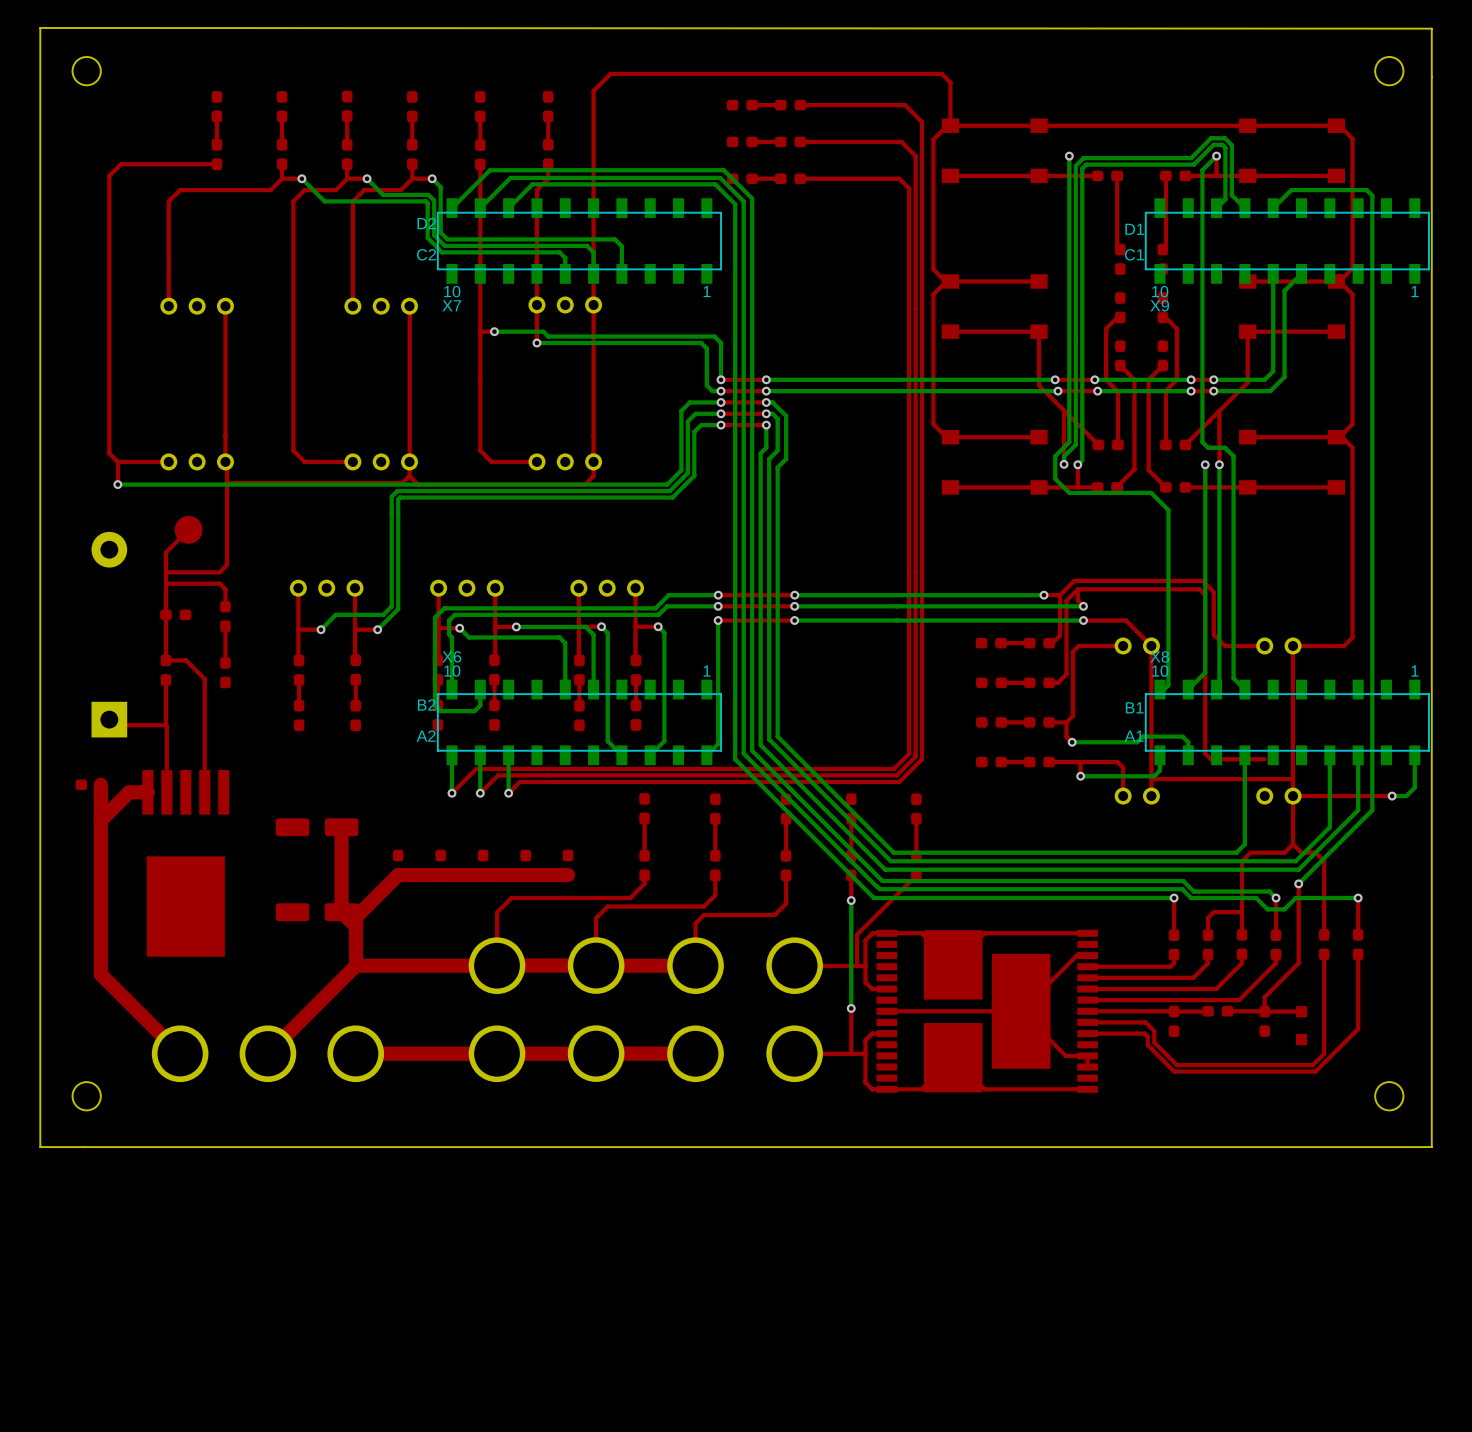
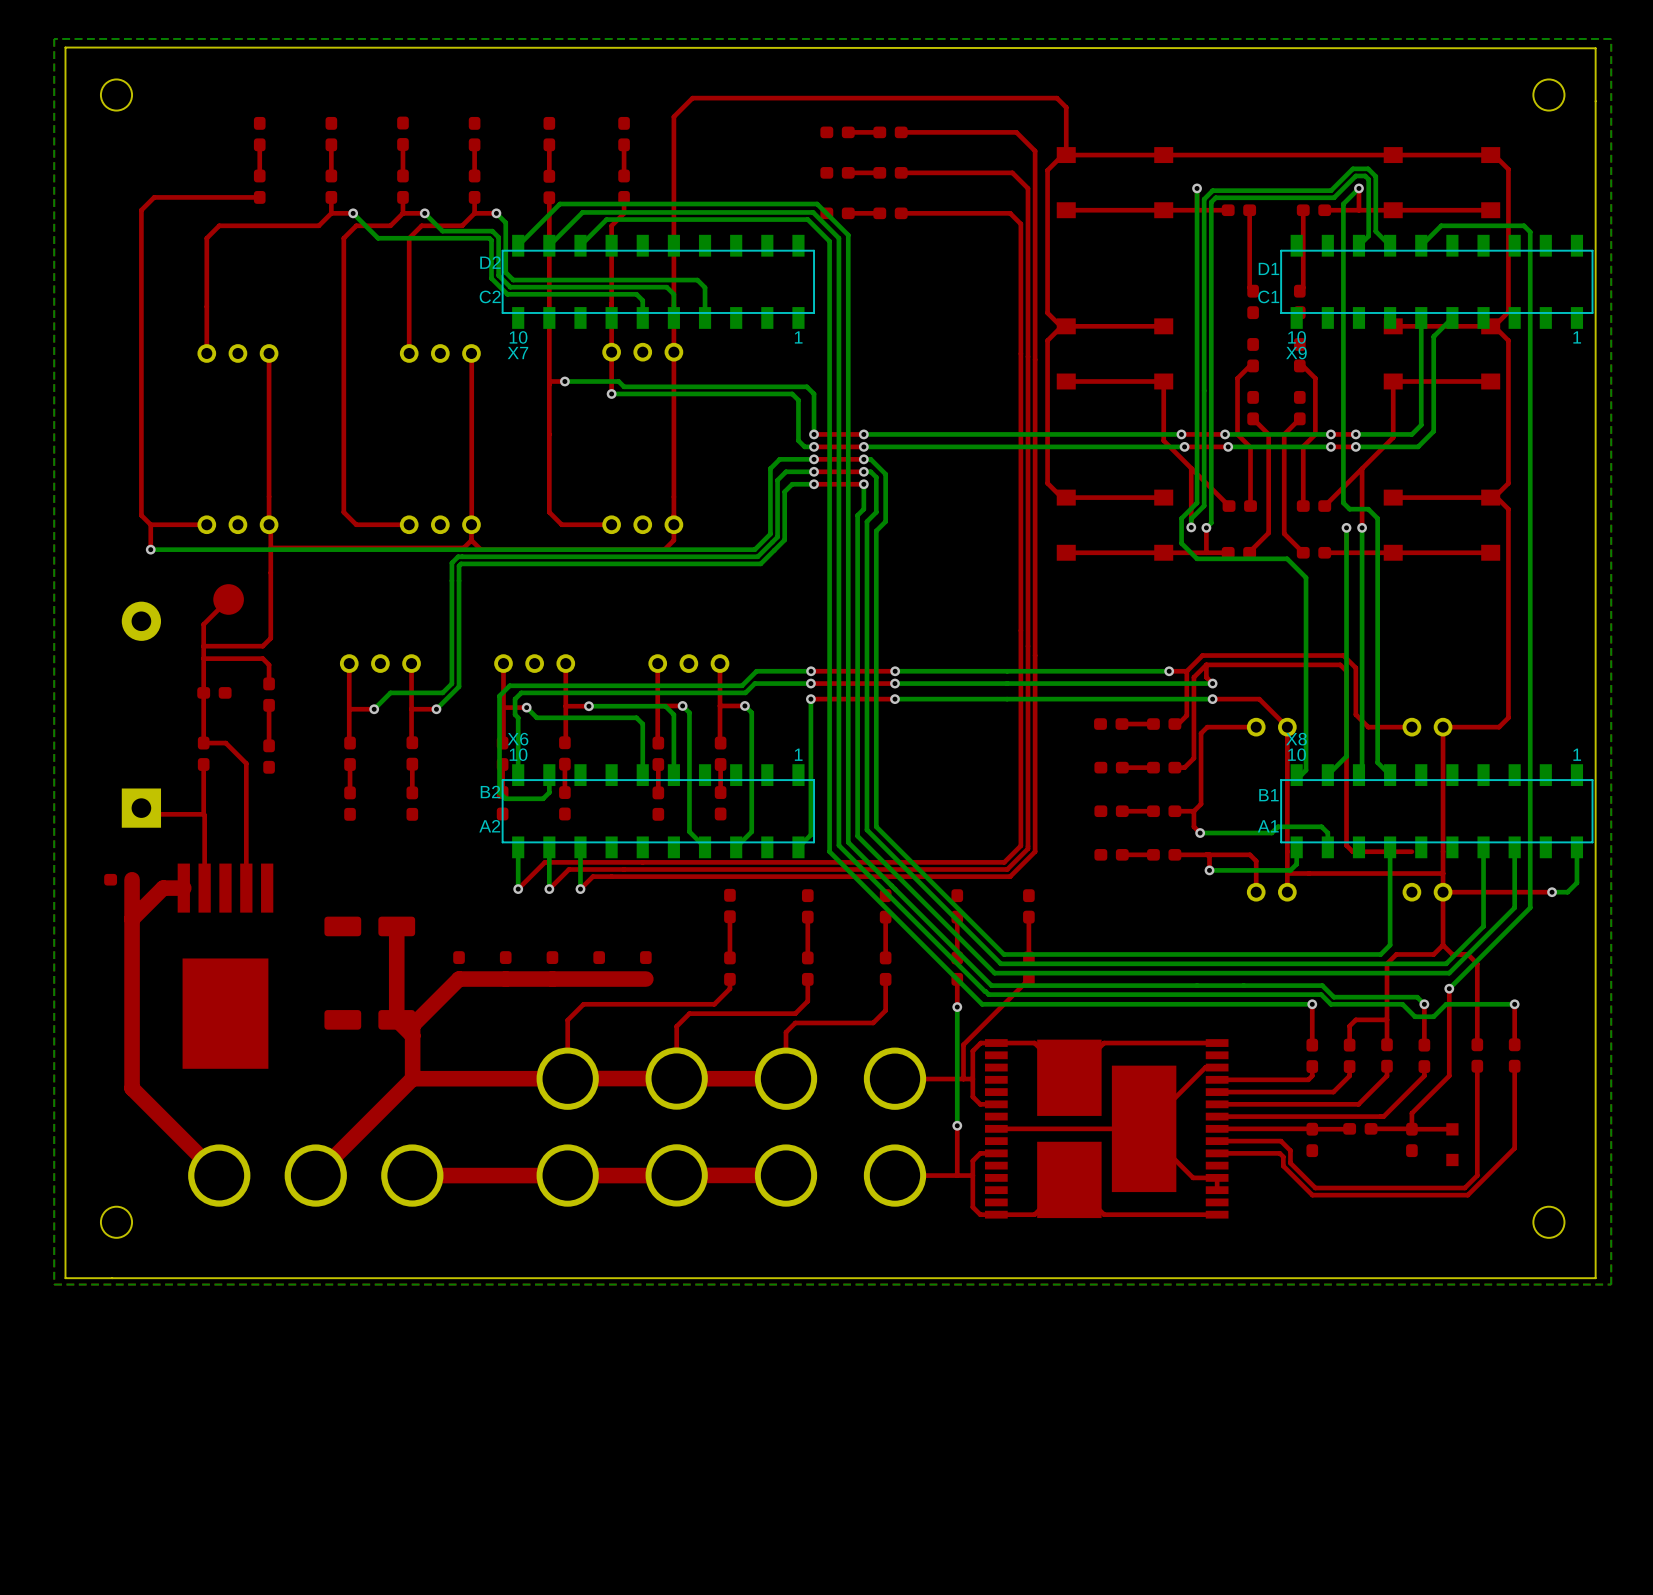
bottom zone outline: none -> (1611, 38) (1611, 1284) (54, 1284) (54, 38) (1611, 38)

